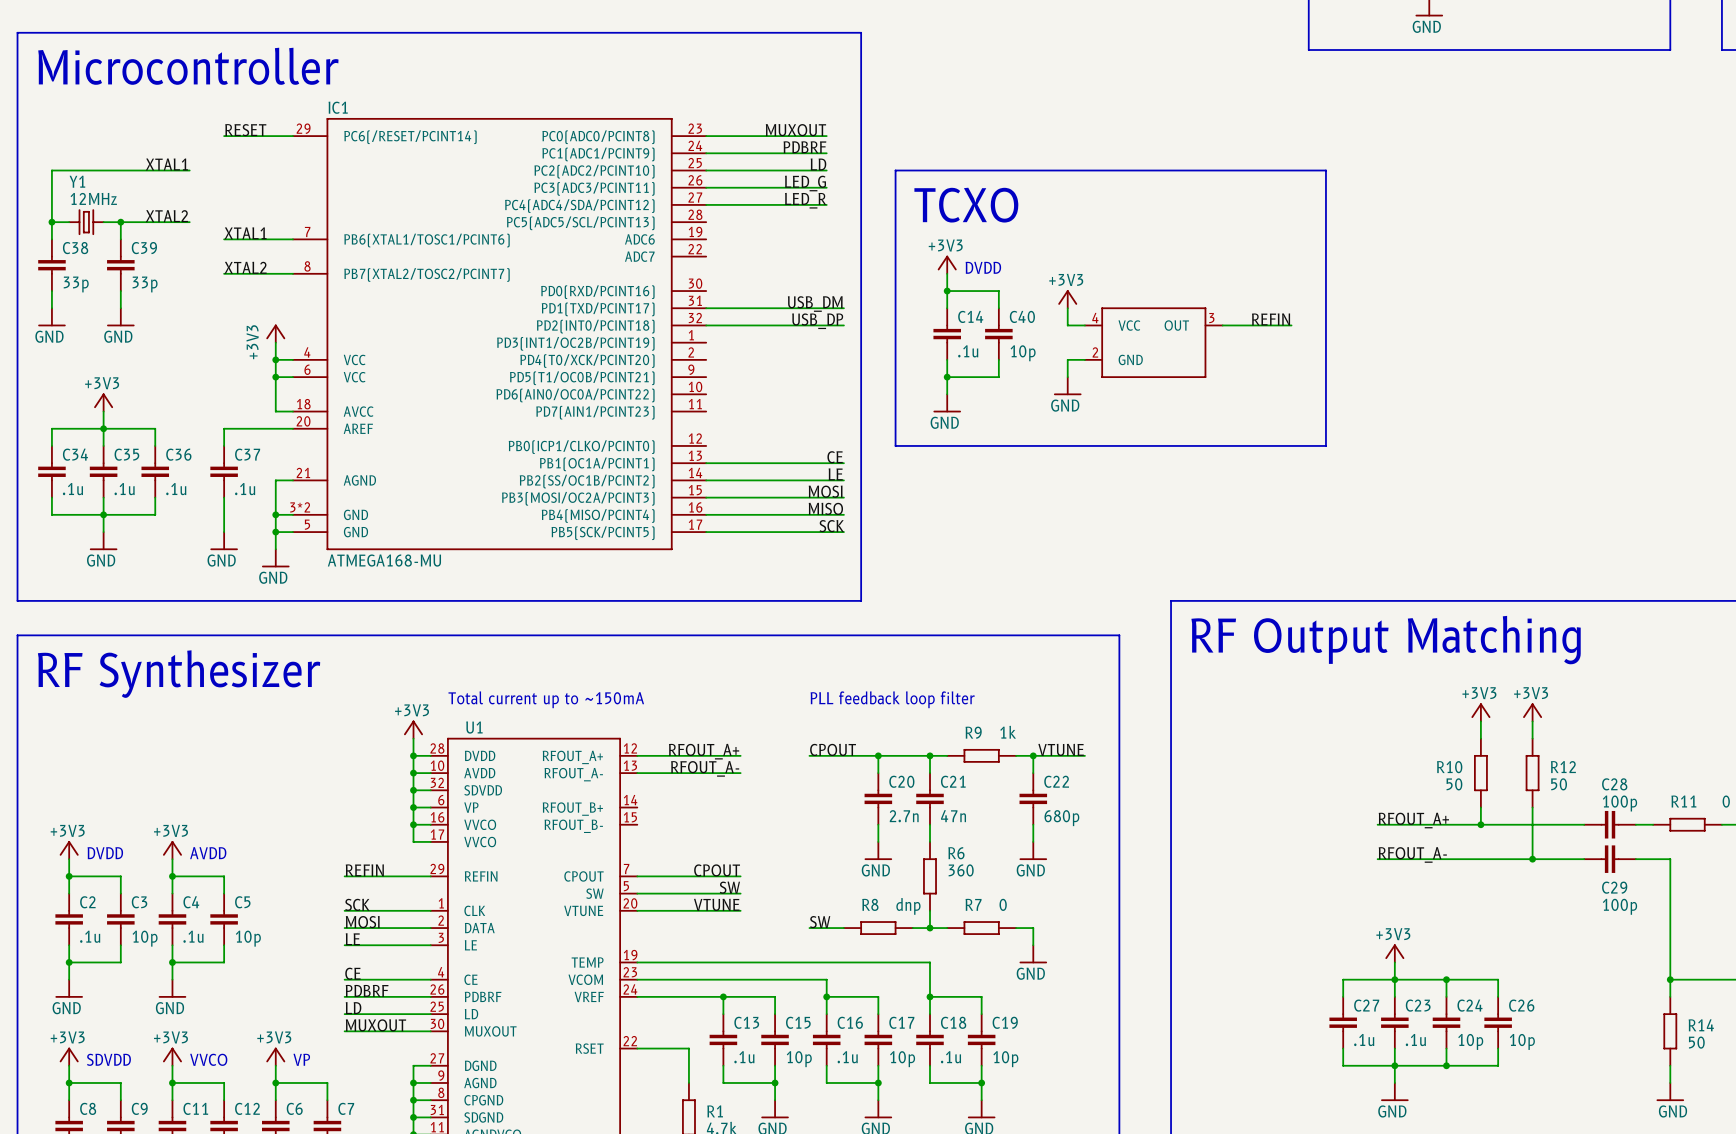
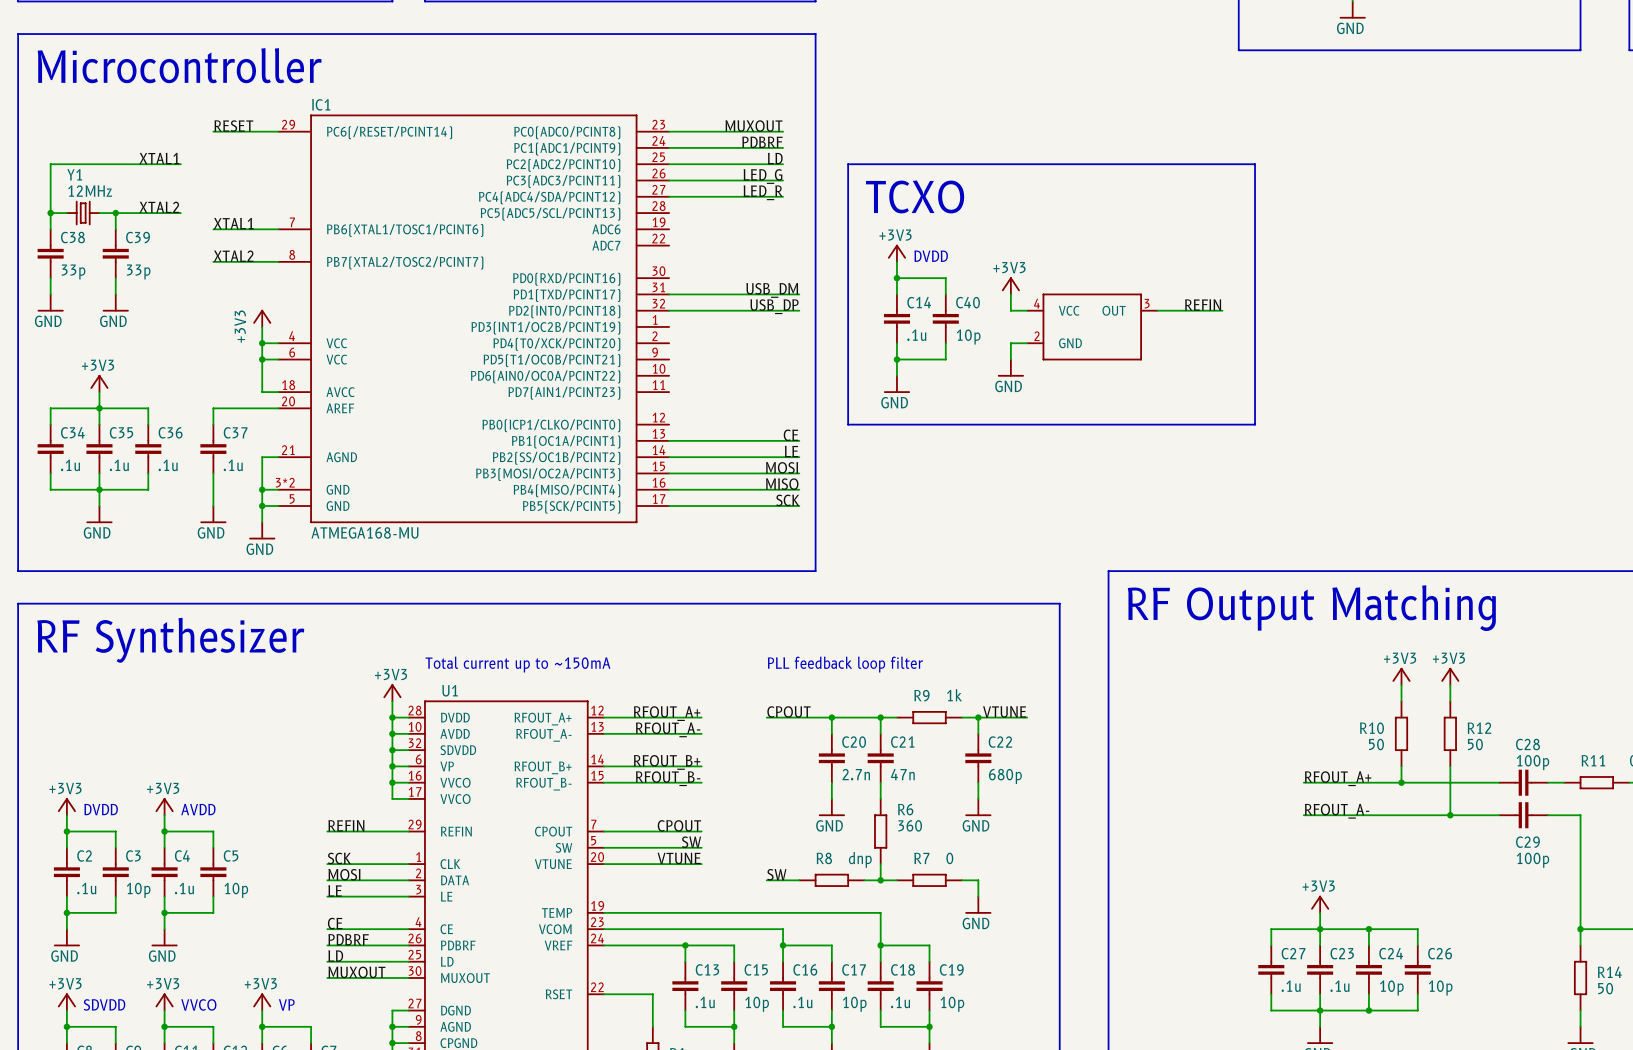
label: none -> RFOUT_B+ (667, 762)
wire: none -> (604, 766) (701, 766)
label: none -> RFOUT_B- (668, 778)
wire: none -> (604, 782) (701, 782)

